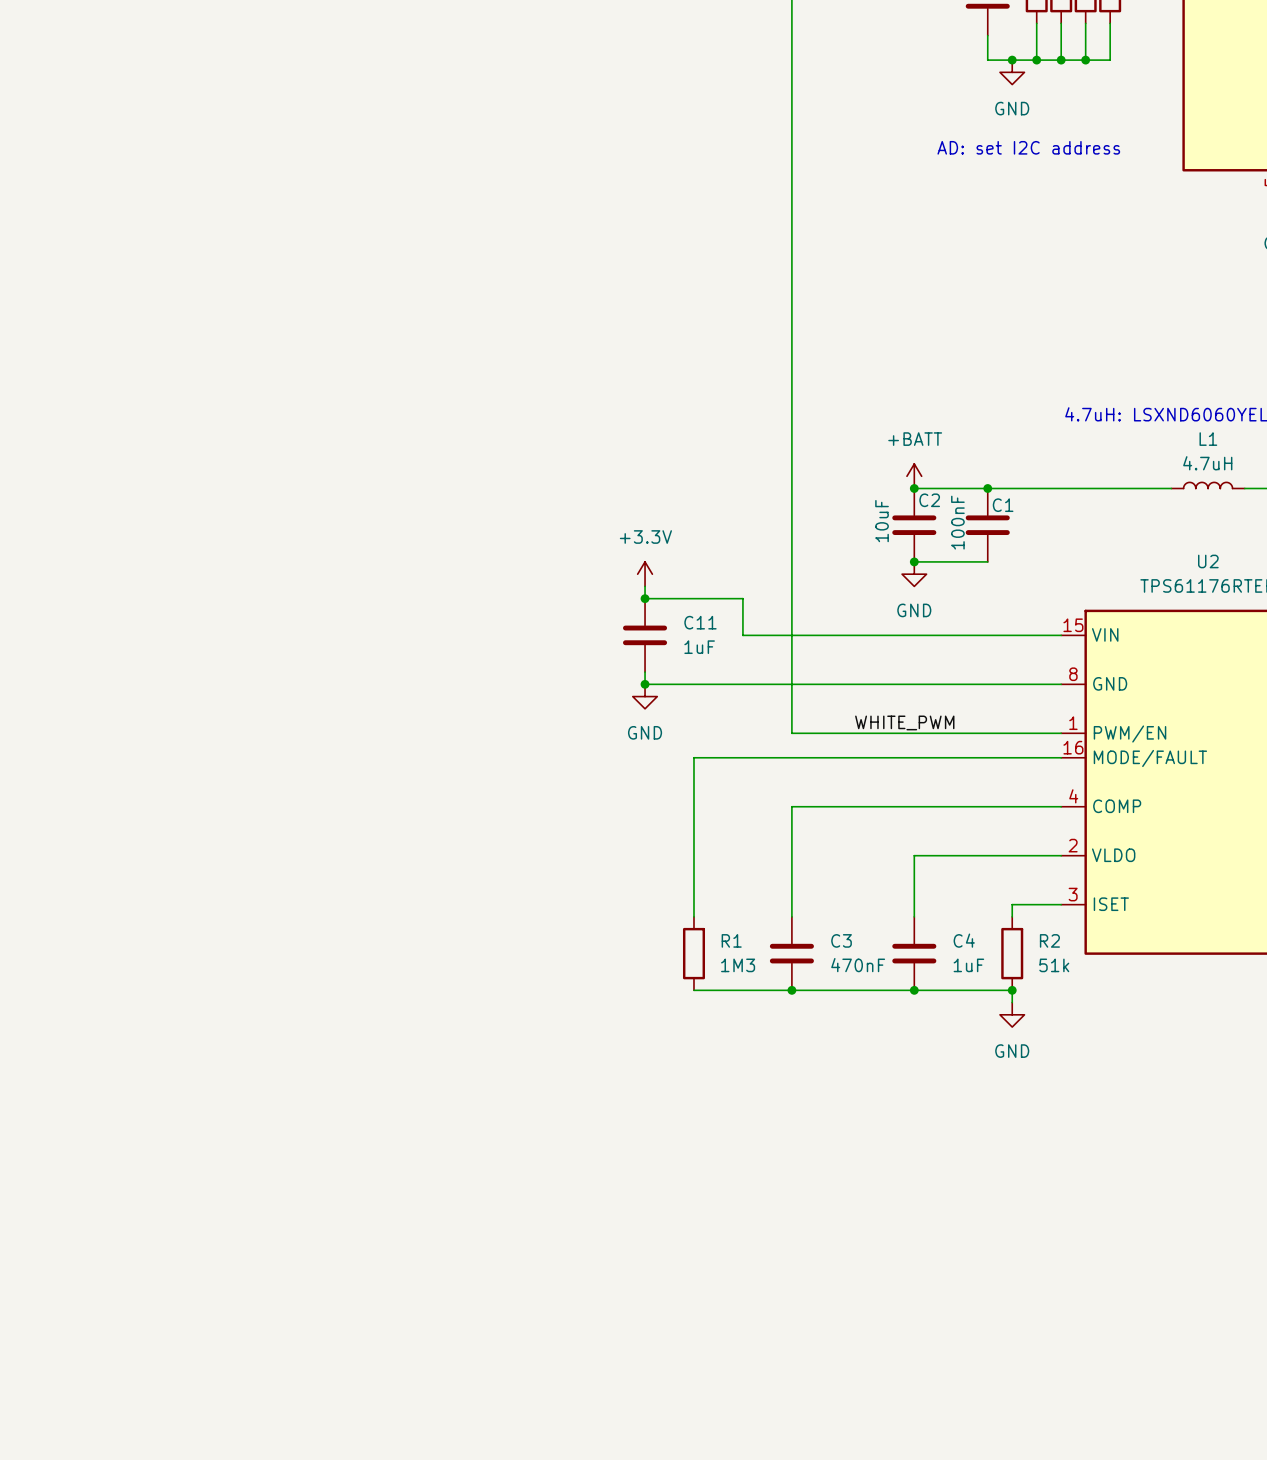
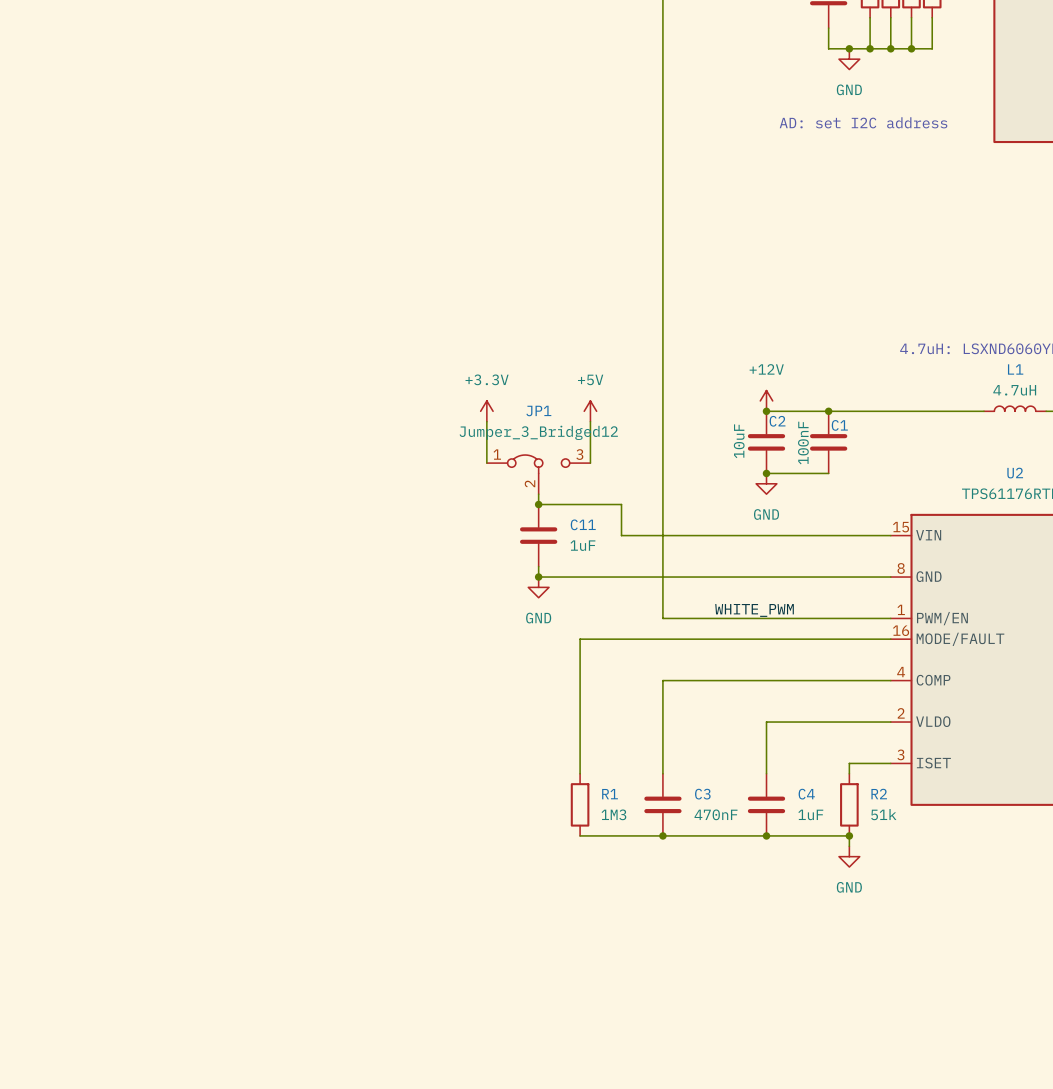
power symbol: +BATT (914, 476) -> +12V (766, 400)
power symbol: none -> +5V (590, 411)
wire: none -> (486, 421) (486, 463)
wire: none -> (590, 421) (590, 463)
JP1: none -> Jumper_3_Bridged12 (538, 474)
power symbol position: +3.3V (645, 574) -> +3.3V (486, 411)

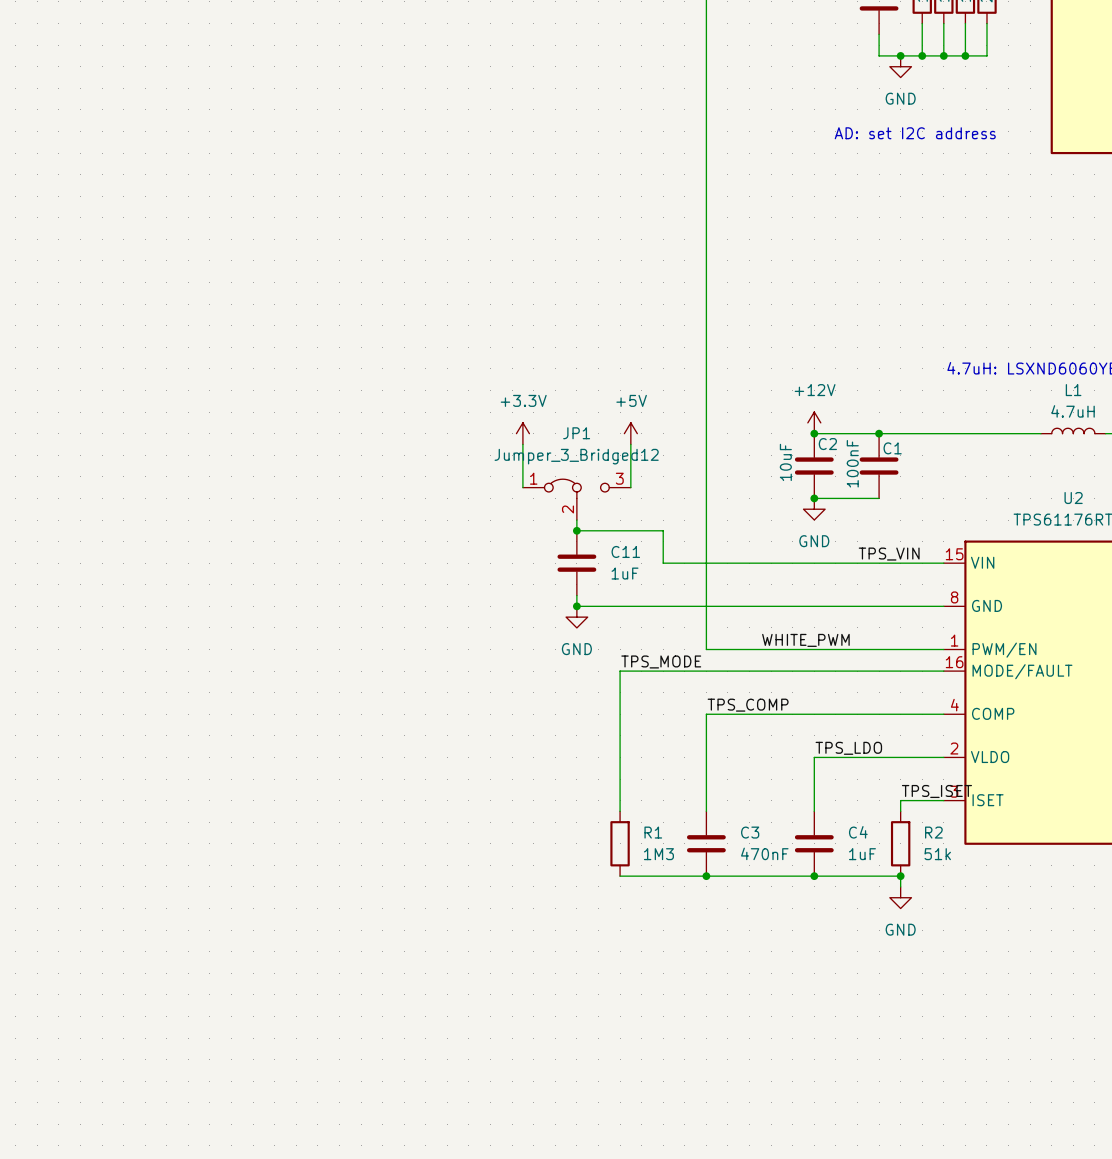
label: none -> TPS_VIN (889, 554)
label: none -> TPS_MODE (661, 661)
label: none -> TPS_COMP (748, 705)
label: none -> TPS_LDO (848, 748)
label: none -> TPS_ISET (936, 791)

